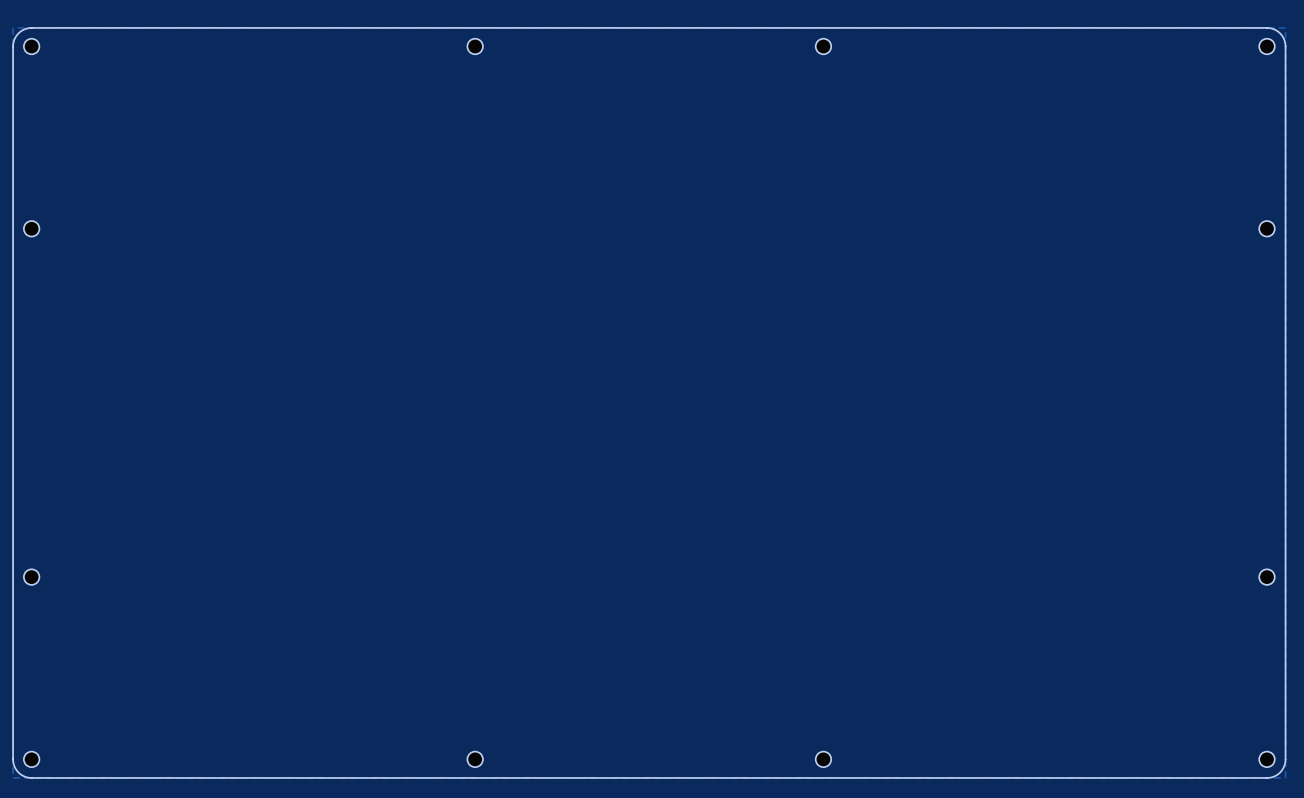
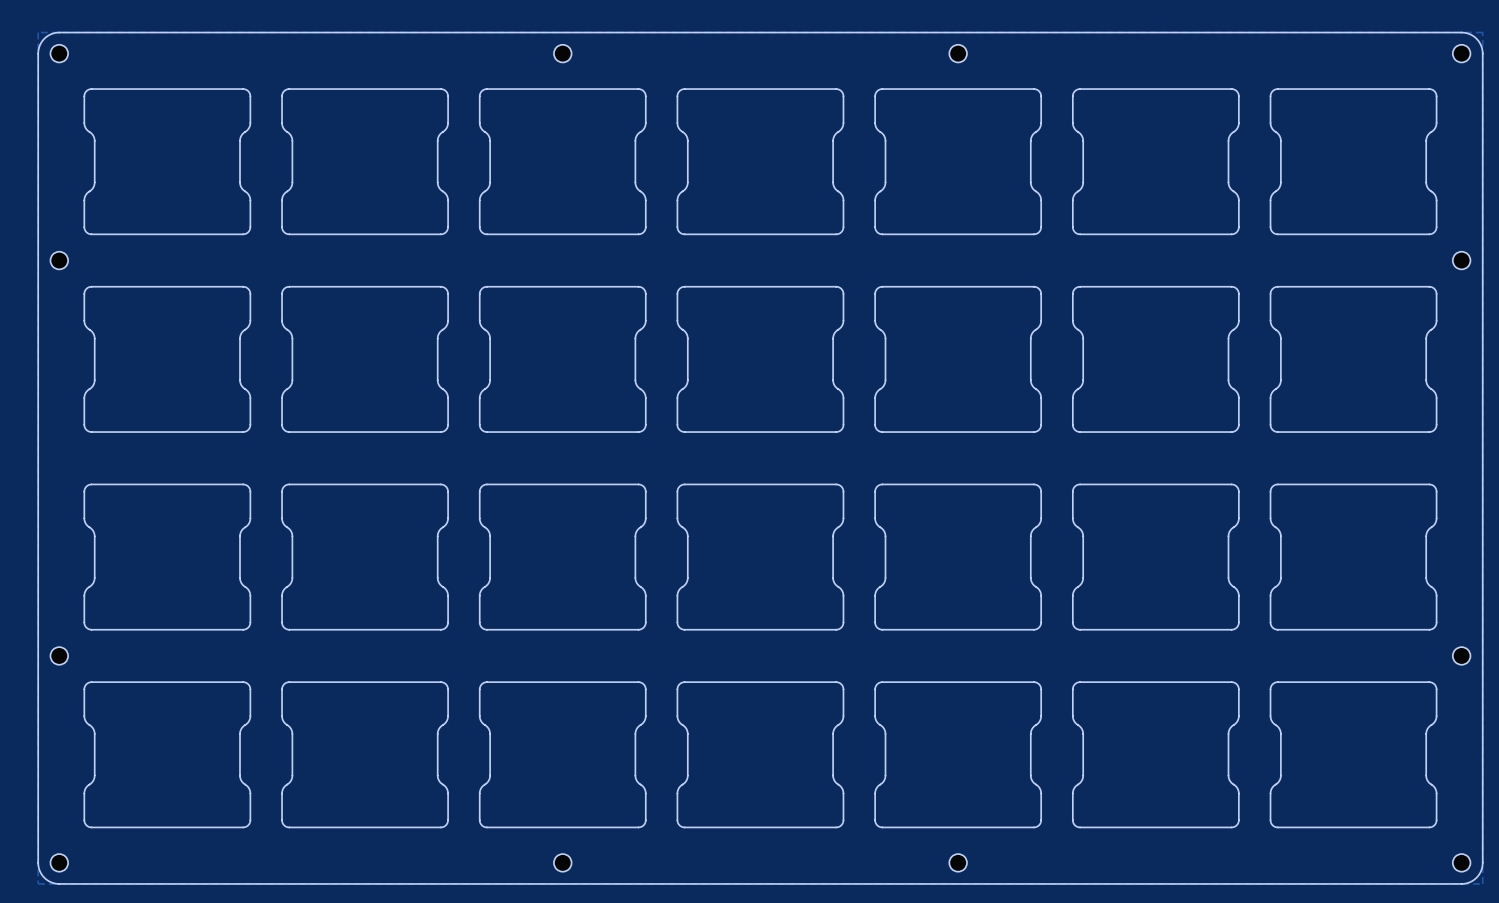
board edge: none -> (91, 89) (243, 89) (248, 91) (250, 96) (250, 124) (240, 139) (239, 182) (241, 187) (250, 199) (250, 227) (248, 232) (243, 234) (91, 234) (86, 232) (84, 227) (84, 199) (94, 183) (94, 140) (93, 135) (84, 125) (84, 96) (86, 91) (91, 89)
board edge: none -> (289, 89) (440, 89) (445, 91) (448, 96) (447, 124) (439, 135) (437, 140) (437, 183) (447, 199) (448, 227) (445, 232) (440, 234) (289, 234) (284, 232) (282, 227) (282, 199) (292, 183) (292, 140) (291, 135) (282, 125) (282, 96) (284, 91) (289, 89)
board edge: none -> (486, 89) (638, 89) (643, 91) (645, 96) (645, 124) (636, 135) (635, 140) (635, 183) (645, 199) (645, 227) (643, 232) (638, 234) (486, 234) (481, 232) (479, 227) (479, 199) (490, 183) (490, 140) (488, 135) (480, 125) (479, 96) (481, 91) (486, 89)
board edge: none -> (684, 89) (836, 89) (841, 91) (843, 96) (843, 124) (834, 135) (833, 140) (833, 183) (843, 199) (843, 227) (841, 232) (836, 234) (684, 234) (679, 232) (677, 227) (677, 199) (687, 183) (687, 140) (686, 135) (677, 125) (677, 96) (679, 91) (684, 89)
board edge: none -> (882, 89) (1033, 89) (1039, 91) (1041, 96) (1041, 124) (1030, 139) (1030, 182) (1032, 187) (1041, 199) (1041, 227) (1039, 232) (1033, 234) (882, 234) (877, 232) (875, 227) (875, 199) (885, 183) (885, 140) (884, 135) (875, 125) (875, 96) (877, 91) (882, 89)
board edge: none -> (1080, 89) (1231, 89) (1236, 91) (1238, 96) (1238, 124) (1229, 135) (1228, 140) (1228, 183) (1238, 199) (1238, 227) (1236, 232) (1231, 234) (1080, 234) (1074, 232) (1072, 227) (1072, 199) (1083, 183) (1083, 140) (1081, 135) (1073, 125) (1072, 96) (1074, 91) (1080, 89)
board edge: none -> (1277, 89) (1429, 89) (1434, 91) (1436, 96) (1436, 124) (1426, 139) (1426, 182) (1427, 187) (1436, 199) (1436, 227) (1434, 232) (1429, 234) (1277, 234) (1272, 232) (1270, 227) (1270, 199) (1280, 183) (1280, 140) (1279, 135) (1270, 125) (1270, 96) (1272, 91) (1277, 89)
board edge: none -> (91, 286) (243, 286) (248, 288) (250, 294) (250, 322) (240, 337) (239, 380) (241, 385) (250, 396) (250, 424) (248, 429) (243, 432) (91, 432) (86, 429) (84, 424) (84, 396) (94, 381) (94, 338) (93, 333) (84, 323) (84, 294) (86, 288) (91, 286)
board edge: none -> (289, 286) (440, 286) (445, 288) (448, 294) (447, 322) (439, 333) (437, 338) (437, 381) (447, 396) (448, 424) (445, 429) (440, 432) (289, 432) (284, 429) (282, 424) (282, 396) (292, 381) (292, 338) (291, 333) (282, 323) (282, 294) (284, 288) (289, 286)
board edge: none -> (486, 286) (638, 286) (643, 288) (645, 294) (645, 322) (636, 333) (635, 338) (635, 381) (645, 396) (645, 424) (643, 429) (638, 432) (486, 432) (481, 429) (479, 424) (479, 396) (490, 381) (490, 338) (488, 333) (480, 323) (479, 294) (481, 288) (486, 286)
board edge: none -> (684, 286) (836, 286) (841, 288) (843, 294) (843, 322) (834, 333) (833, 338) (833, 381) (843, 396) (843, 424) (841, 429) (836, 432) (684, 432) (679, 429) (677, 424) (677, 396) (687, 381) (687, 338) (686, 333) (677, 323) (677, 294) (679, 288) (684, 286)
board edge: none -> (882, 286) (1033, 286) (1039, 288) (1041, 294) (1041, 322) (1030, 337) (1030, 380) (1032, 385) (1041, 396) (1041, 424) (1039, 429) (1033, 432) (882, 432) (877, 429) (875, 424) (875, 396) (885, 381) (885, 338) (884, 333) (875, 323) (875, 294) (877, 288) (882, 286)
board edge: none -> (1080, 286) (1231, 286) (1236, 288) (1238, 294) (1238, 322) (1229, 333) (1228, 338) (1228, 381) (1238, 396) (1238, 424) (1236, 429) (1231, 432) (1080, 432) (1074, 429) (1072, 424) (1072, 396) (1083, 381) (1083, 338) (1081, 333) (1073, 323) (1072, 294) (1074, 288) (1080, 286)
board edge: none -> (1277, 286) (1429, 286) (1434, 288) (1436, 294) (1436, 322) (1426, 337) (1426, 380) (1427, 385) (1436, 396) (1436, 424) (1434, 429) (1429, 432) (1277, 432) (1272, 429) (1270, 424) (1270, 396) (1280, 381) (1280, 338) (1279, 333) (1270, 323) (1270, 294) (1272, 288) (1277, 286)
board edge: none -> (91, 484) (243, 484) (248, 486) (250, 491) (250, 519) (240, 534) (239, 577) (241, 583) (250, 594) (250, 622) (248, 627) (243, 629) (91, 629) (86, 627) (84, 622) (84, 594) (94, 579) (94, 536) (93, 531) (84, 521) (84, 491) (86, 486) (91, 484)
board edge: none -> (289, 484) (440, 484) (445, 486) (448, 491) (447, 519) (439, 531) (437, 536) (437, 579) (447, 594) (448, 622) (445, 627) (440, 629) (289, 629) (284, 627) (282, 622) (282, 594) (292, 579) (292, 536) (291, 531) (282, 521) (282, 491) (284, 486) (289, 484)
board edge: none -> (486, 484) (638, 484) (643, 486) (645, 491) (645, 519) (636, 531) (635, 536) (635, 579) (645, 594) (645, 622) (643, 627) (638, 629) (486, 629) (481, 627) (479, 622) (479, 594) (490, 579) (490, 536) (488, 531) (480, 521) (479, 491) (481, 486) (486, 484)
board edge: none -> (684, 484) (836, 484) (841, 486) (843, 491) (843, 519) (834, 531) (833, 536) (833, 579) (843, 594) (843, 622) (841, 627) (836, 629) (684, 629) (679, 627) (677, 622) (677, 594) (687, 579) (687, 536) (686, 531) (677, 521) (677, 491) (679, 486) (684, 484)
board edge: none -> (882, 484) (1033, 484) (1039, 486) (1041, 491) (1041, 519) (1030, 534) (1030, 577) (1032, 583) (1041, 594) (1041, 622) (1039, 627) (1033, 629) (882, 629) (877, 627) (875, 622) (875, 594) (885, 579) (885, 536) (884, 531) (875, 521) (875, 491) (877, 486) (882, 484)
board edge: none -> (1080, 484) (1231, 484) (1236, 486) (1238, 491) (1238, 519) (1229, 531) (1228, 536) (1228, 579) (1238, 594) (1238, 622) (1236, 627) (1231, 629) (1080, 629) (1074, 627) (1072, 622) (1072, 594) (1083, 579) (1083, 536) (1081, 531) (1073, 521) (1072, 491) (1074, 486) (1080, 484)
board edge: none -> (1277, 484) (1429, 484) (1434, 486) (1436, 491) (1436, 519) (1426, 534) (1426, 577) (1427, 583) (1436, 594) (1436, 622) (1434, 627) (1429, 629) (1277, 629) (1272, 627) (1270, 622) (1270, 594) (1280, 579) (1280, 536) (1279, 531) (1270, 521) (1270, 491) (1272, 486) (1277, 484)
board edge: none -> (91, 682) (243, 682) (248, 684) (250, 689) (250, 717) (240, 732) (239, 775) (241, 780) (250, 792) (250, 820) (248, 825) (243, 827) (91, 827) (86, 825) (84, 820) (84, 792) (94, 776) (94, 734) (93, 728) (84, 718) (84, 689) (86, 684) (91, 682)
board edge: none -> (289, 682) (440, 682) (445, 684) (448, 689) (447, 717) (439, 728) (437, 734) (437, 776) (447, 792) (448, 820) (445, 825) (440, 827) (289, 827) (284, 825) (282, 820) (282, 792) (292, 776) (292, 734) (291, 728) (282, 718) (282, 689) (284, 684) (289, 682)
board edge: none -> (486, 682) (638, 682) (643, 684) (645, 689) (645, 717) (636, 728) (635, 734) (635, 776) (645, 792) (645, 820) (643, 825) (638, 827) (486, 827) (481, 825) (479, 820) (479, 792) (490, 776) (490, 734) (488, 728) (480, 718) (479, 689) (481, 684) (486, 682)
board edge: none -> (684, 682) (836, 682) (841, 684) (843, 689) (843, 717) (834, 728) (833, 734) (833, 776) (843, 792) (843, 820) (841, 825) (836, 827) (684, 827) (679, 825) (677, 820) (677, 792) (687, 776) (687, 734) (686, 728) (677, 718) (677, 689) (679, 684) (684, 682)
board edge: none -> (882, 682) (1033, 682) (1039, 684) (1041, 689) (1041, 717) (1030, 732) (1030, 775) (1032, 780) (1041, 792) (1041, 820) (1039, 825) (1033, 827) (882, 827) (877, 825) (875, 820) (875, 792) (885, 776) (885, 734) (884, 728) (875, 718) (875, 689) (877, 684) (882, 682)
board edge: none -> (1080, 682) (1231, 682) (1236, 684) (1238, 689) (1238, 717) (1229, 728) (1228, 734) (1228, 776) (1238, 792) (1238, 820) (1236, 825) (1231, 827) (1080, 827) (1074, 825) (1072, 820) (1072, 792) (1083, 776) (1083, 734) (1081, 728) (1073, 718) (1072, 689) (1074, 684) (1080, 682)
board edge: none -> (1277, 682) (1429, 682) (1434, 684) (1436, 689) (1436, 717) (1426, 732) (1426, 775) (1427, 780) (1436, 792) (1436, 820) (1434, 825) (1429, 827) (1277, 827) (1272, 825) (1270, 820) (1270, 792) (1280, 776) (1280, 734) (1279, 728) (1270, 718) (1270, 689) (1272, 684) (1277, 682)

